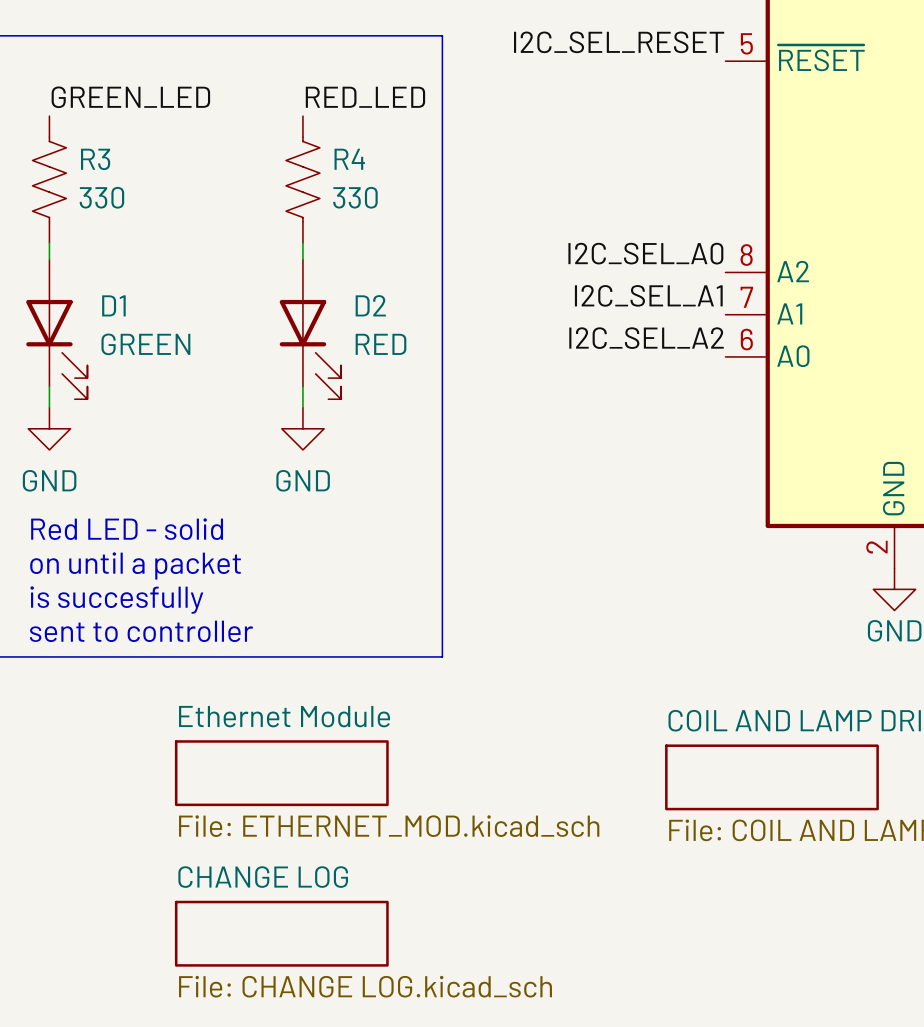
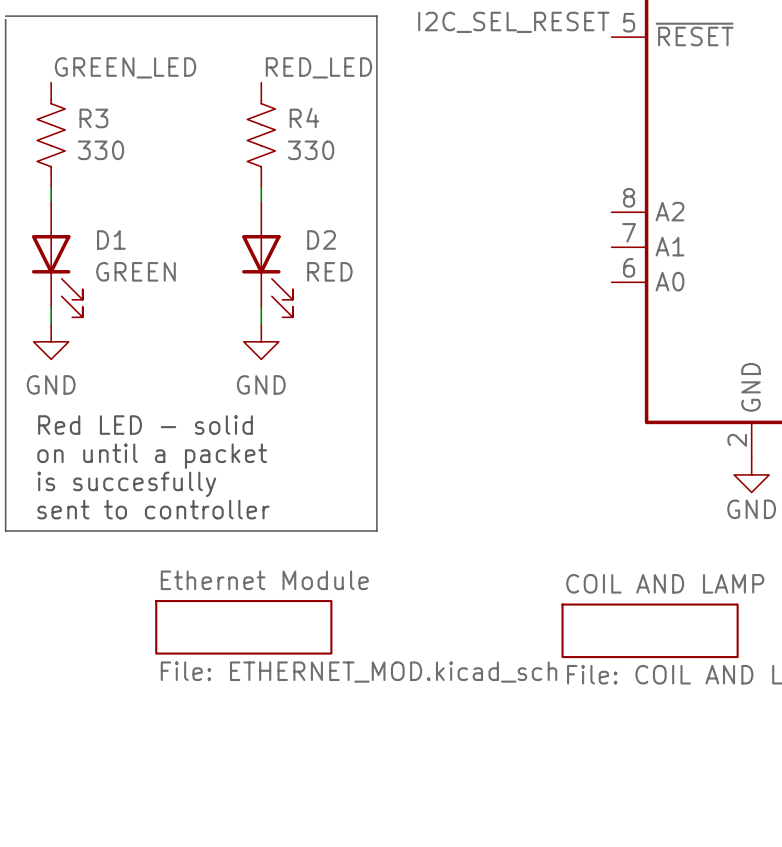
label: I2C_SEL_A0 (645, 253) -> none
label: I2C_SEL_A1 (648, 295) -> none
label: I2C_SEL_A2 (646, 338) -> none
sheet CHANGE LOG: File: CHANGE LOG.kicad_sch (281, 933) -> none

